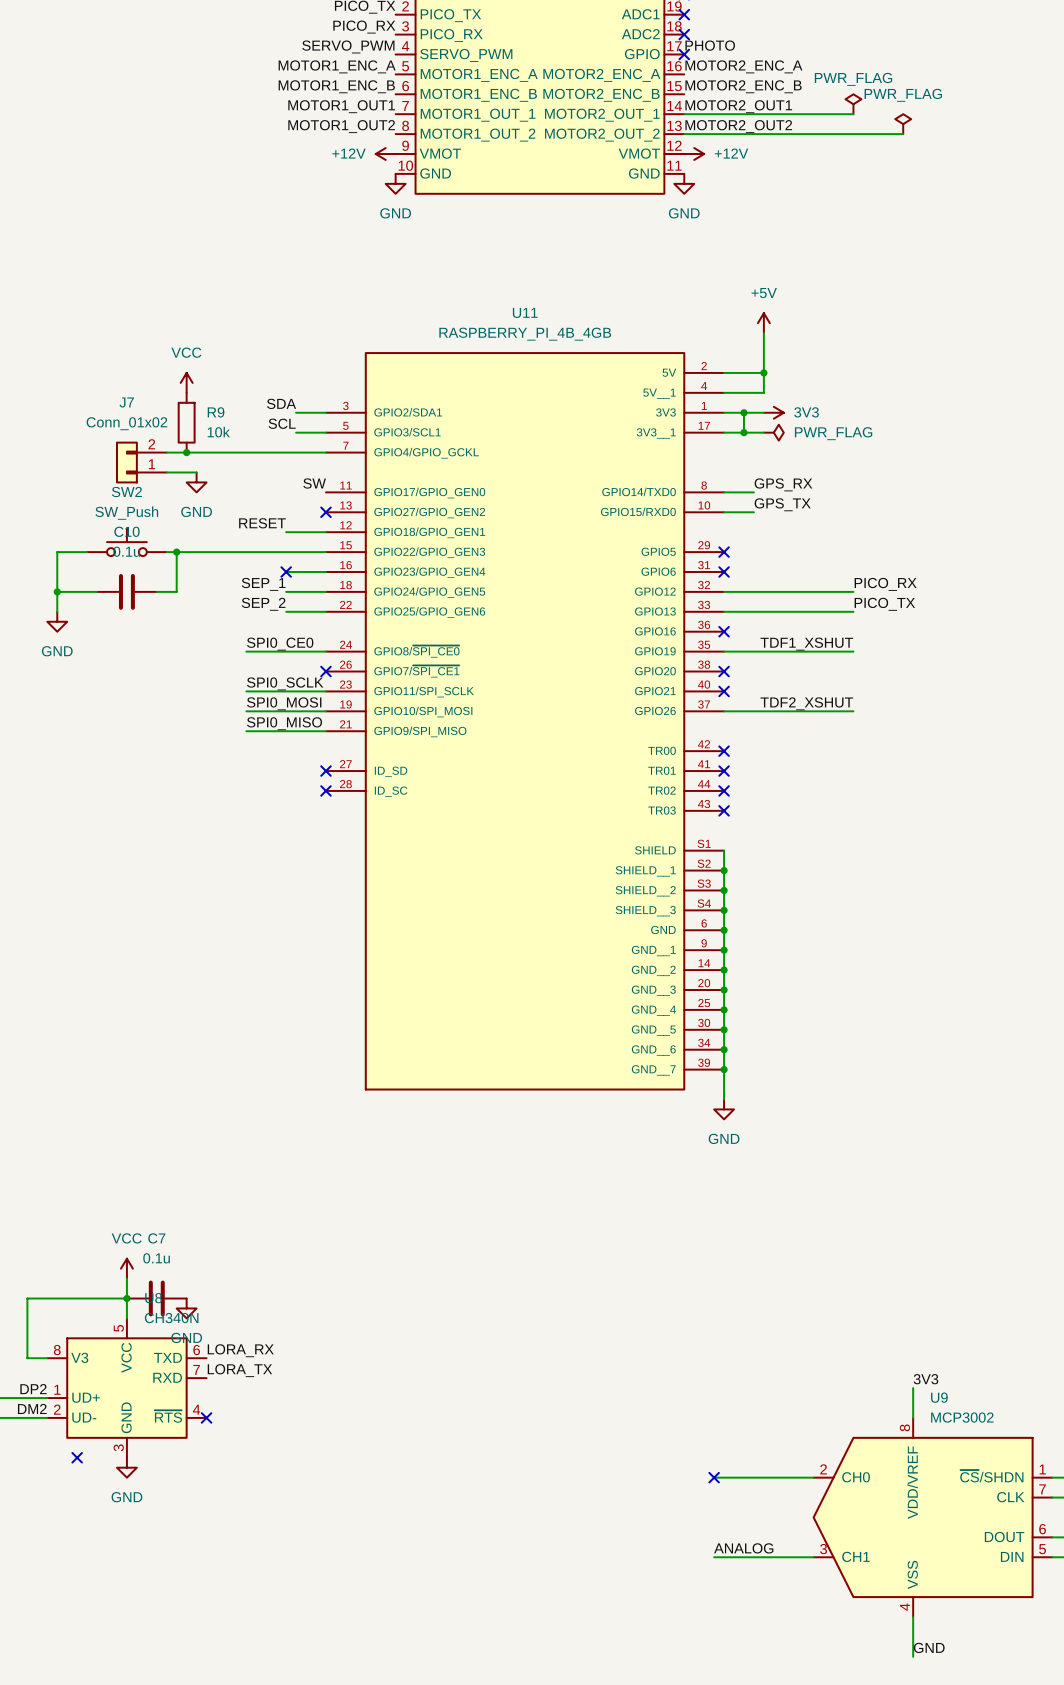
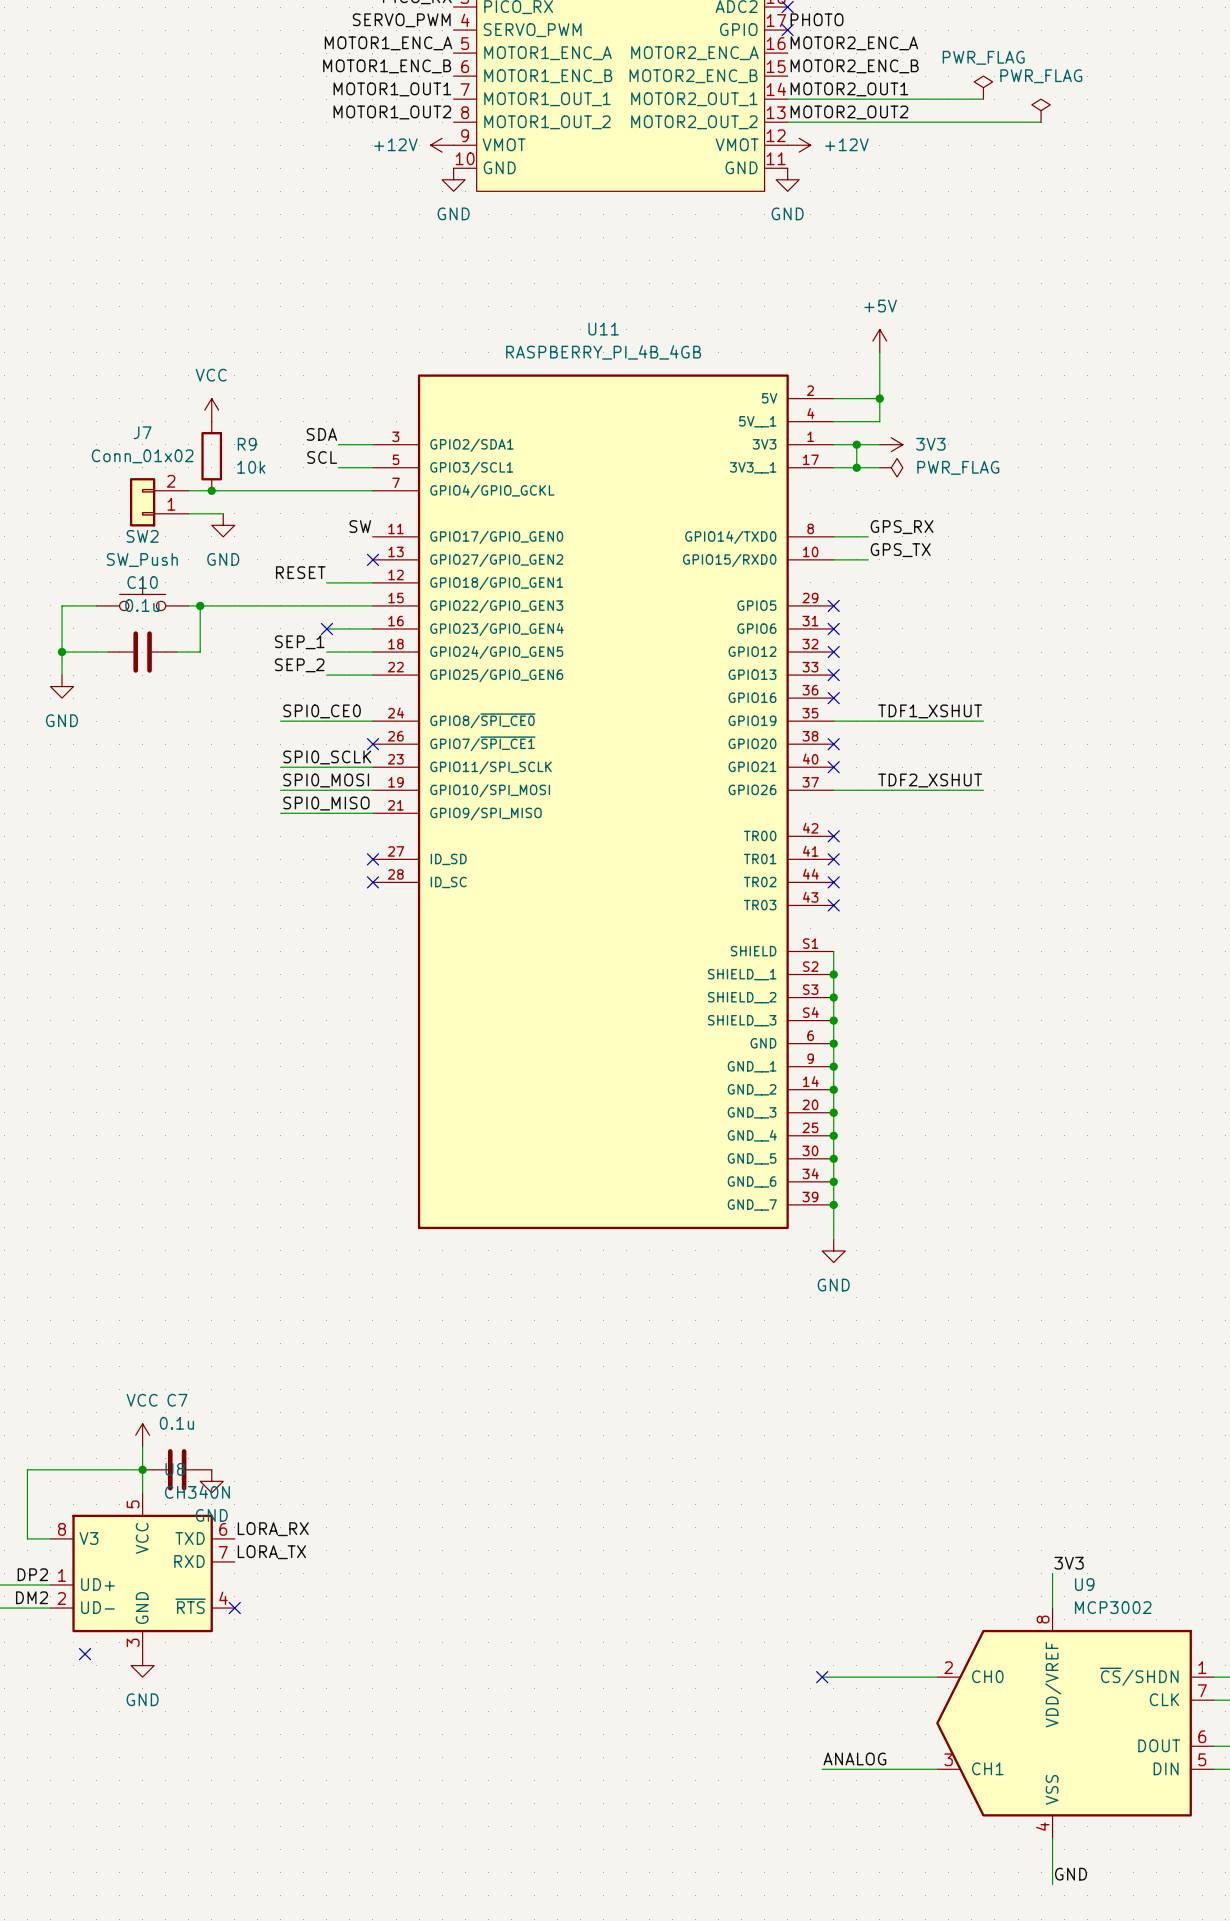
label: PICO_RX (885, 584) -> none
wire: (724, 591) (853, 591) -> none
no-connect mark: none -> (833, 652)
label: PICO_TX (884, 604) -> none
wire: (724, 611) (853, 611) -> none
no-connect mark: none -> (833, 675)

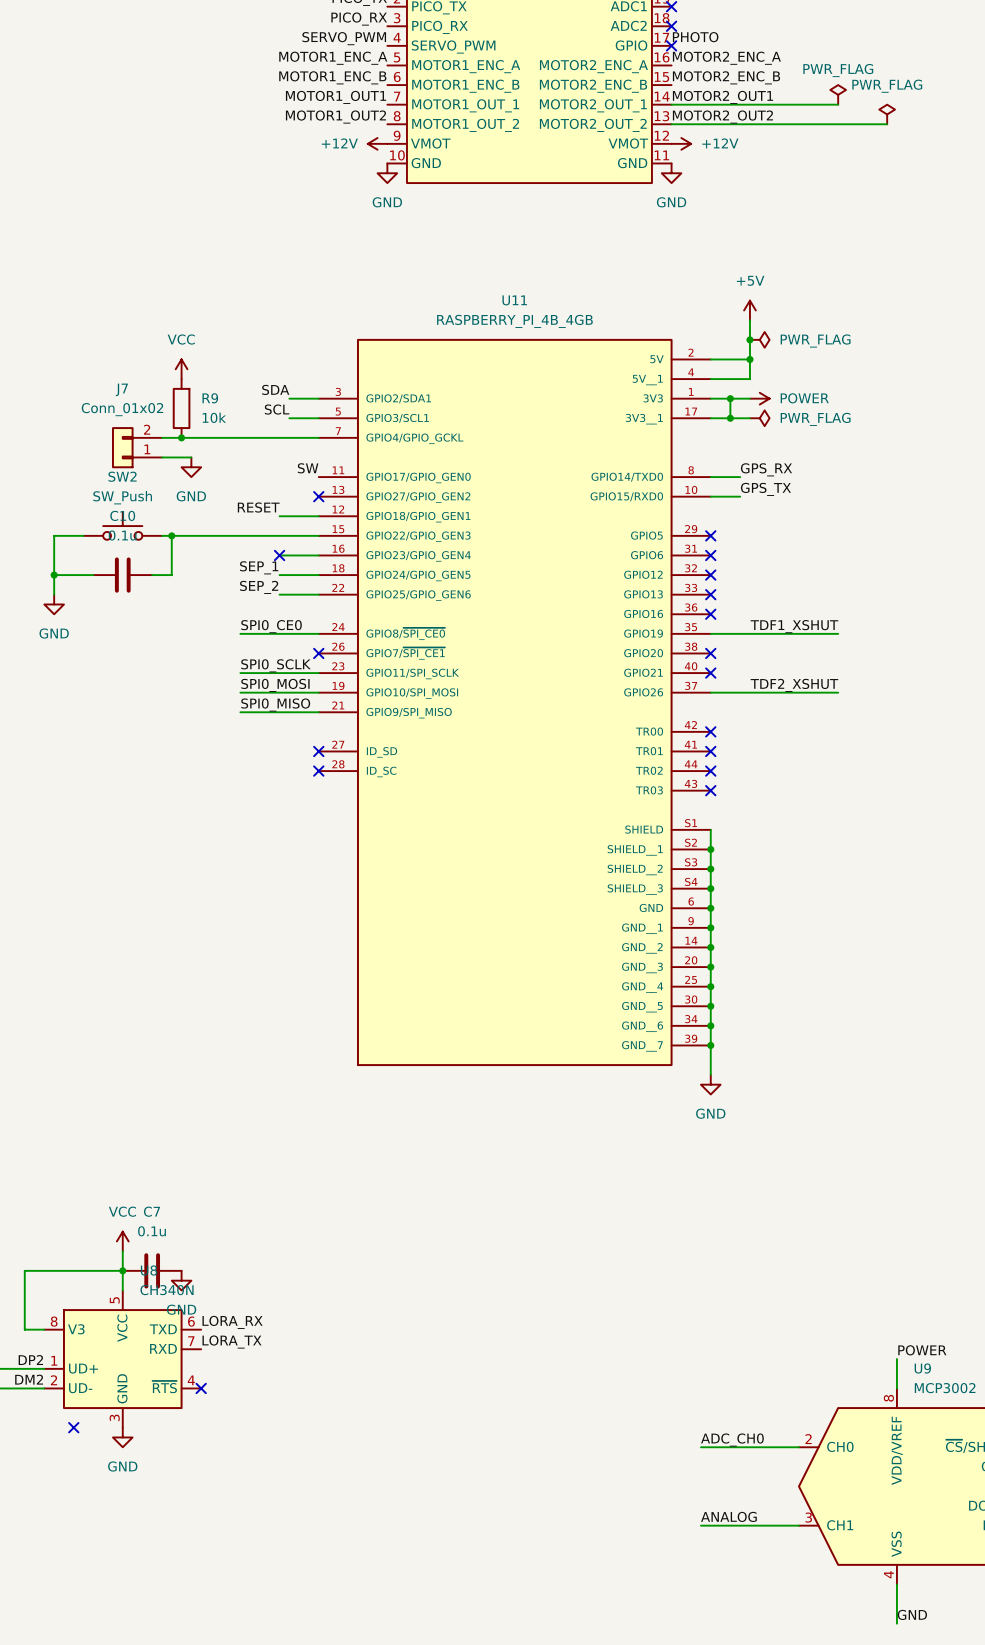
junction: none -> (749, 339)
power symbol: none -> PWR_FLAG (759, 339)
power symbol: 3V3 (891, 444) -> POWER (759, 398)
label: 3V3 (1069, 1563) -> POWER (922, 1350)
label: none -> ADC_CH0 (732, 1440)
no-connect mark: (822, 1677) -> none

